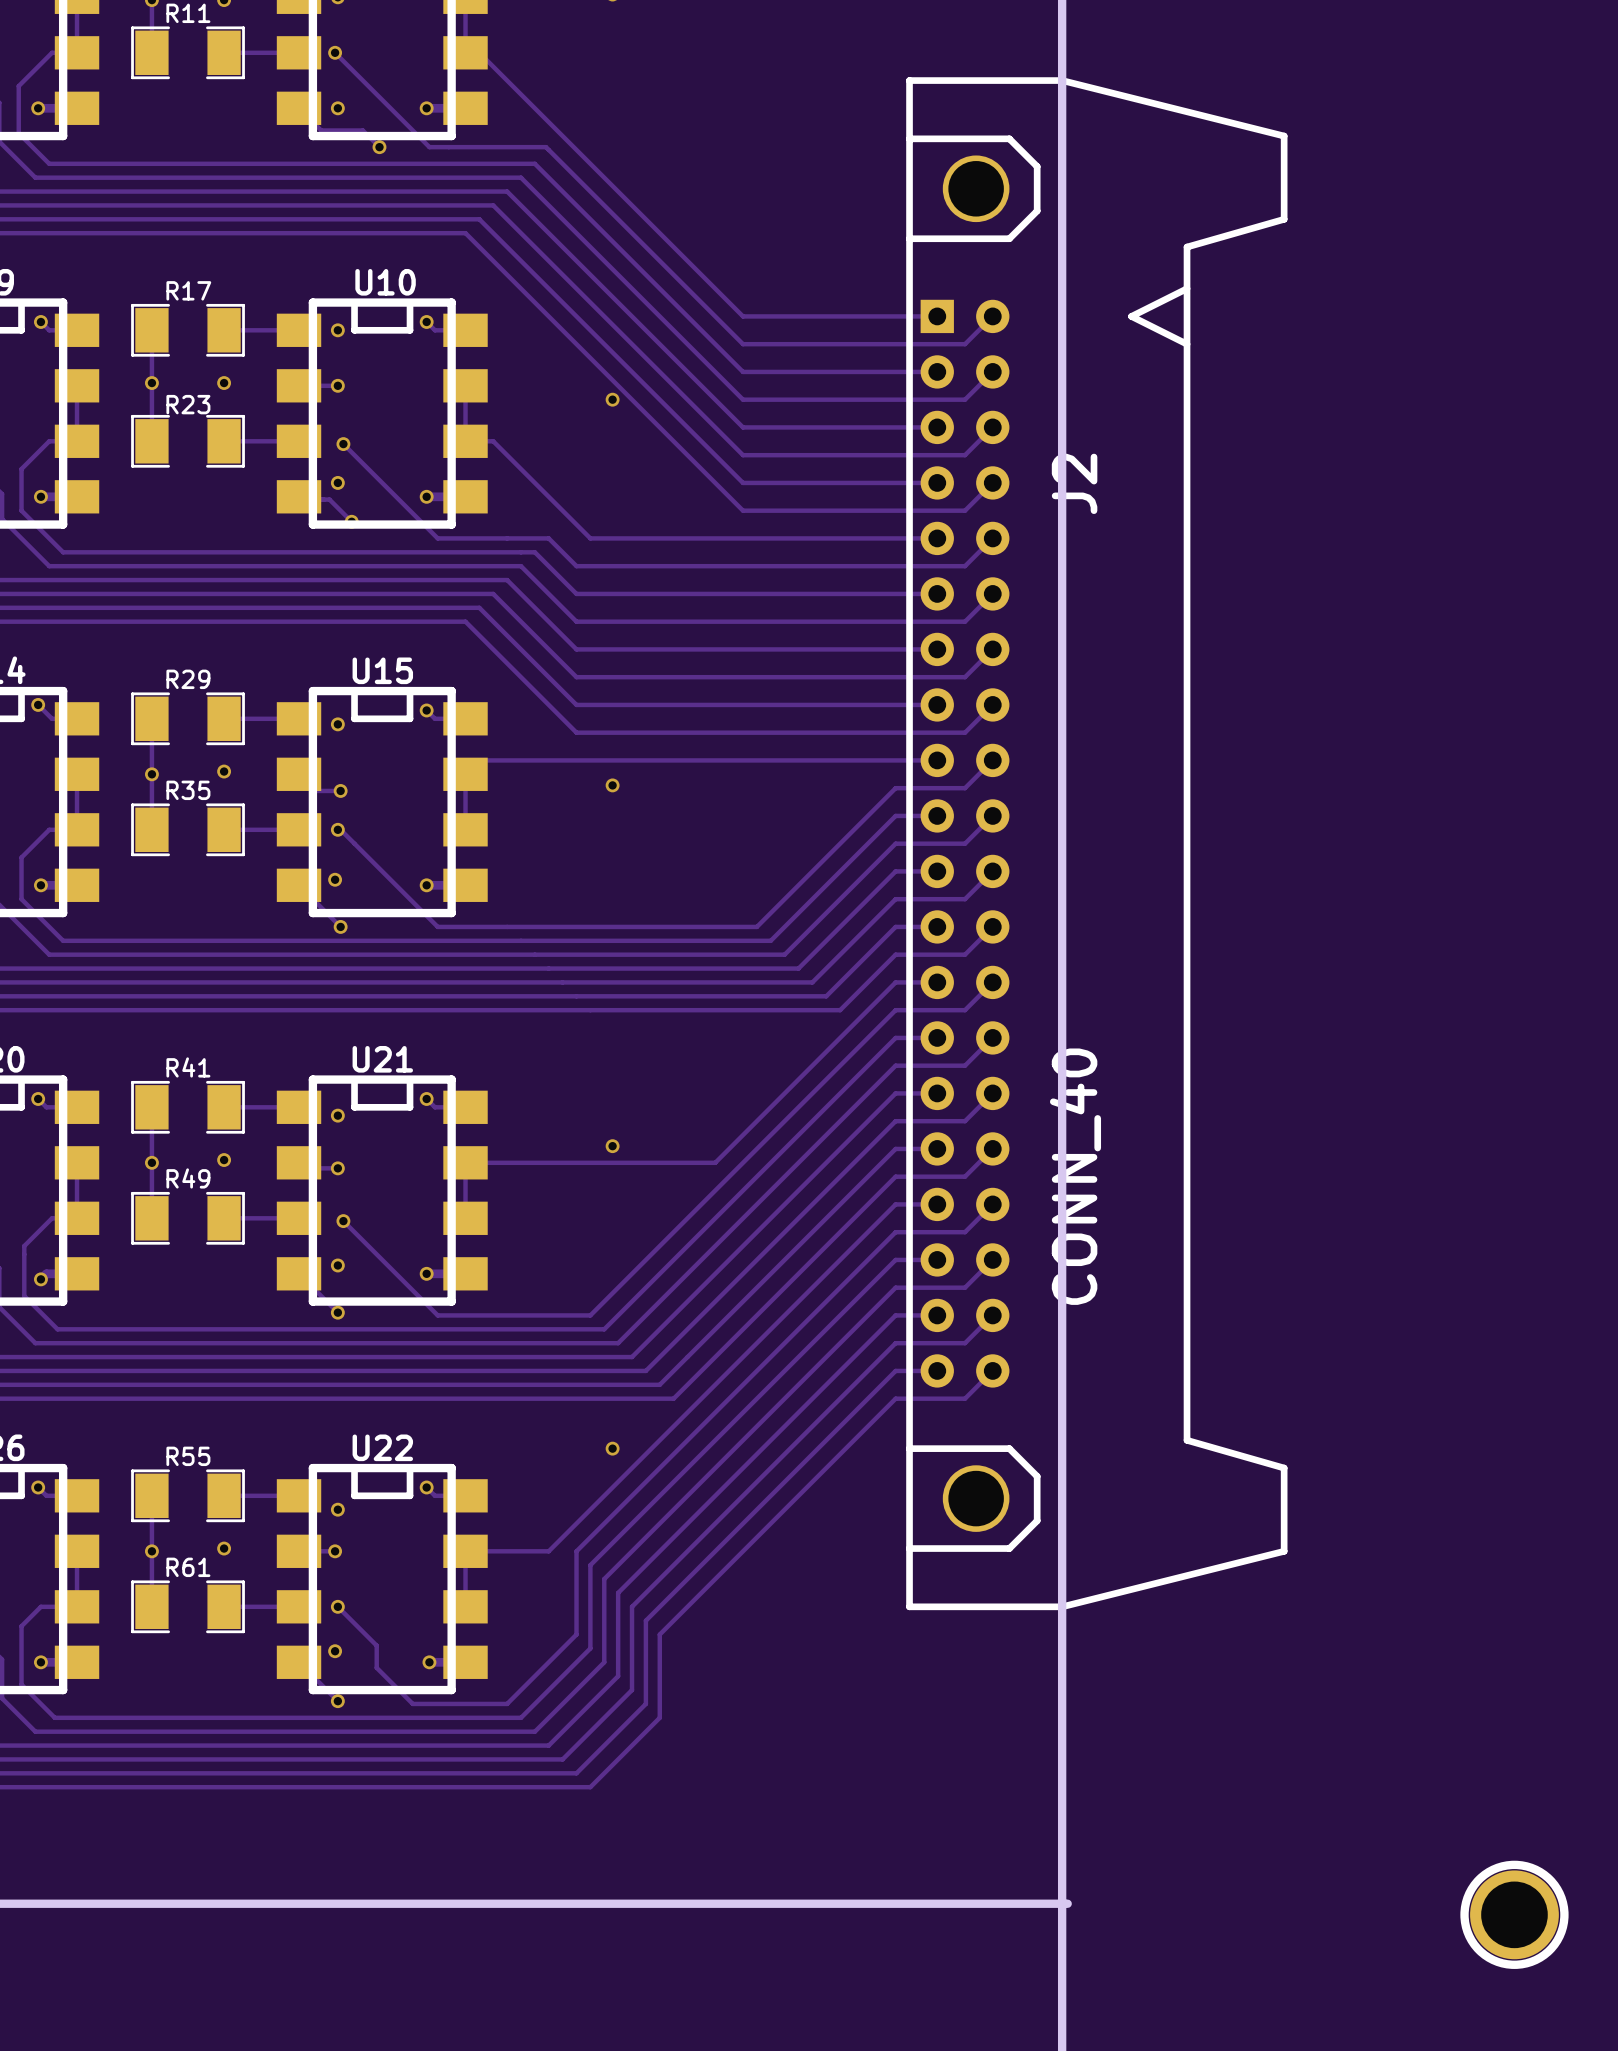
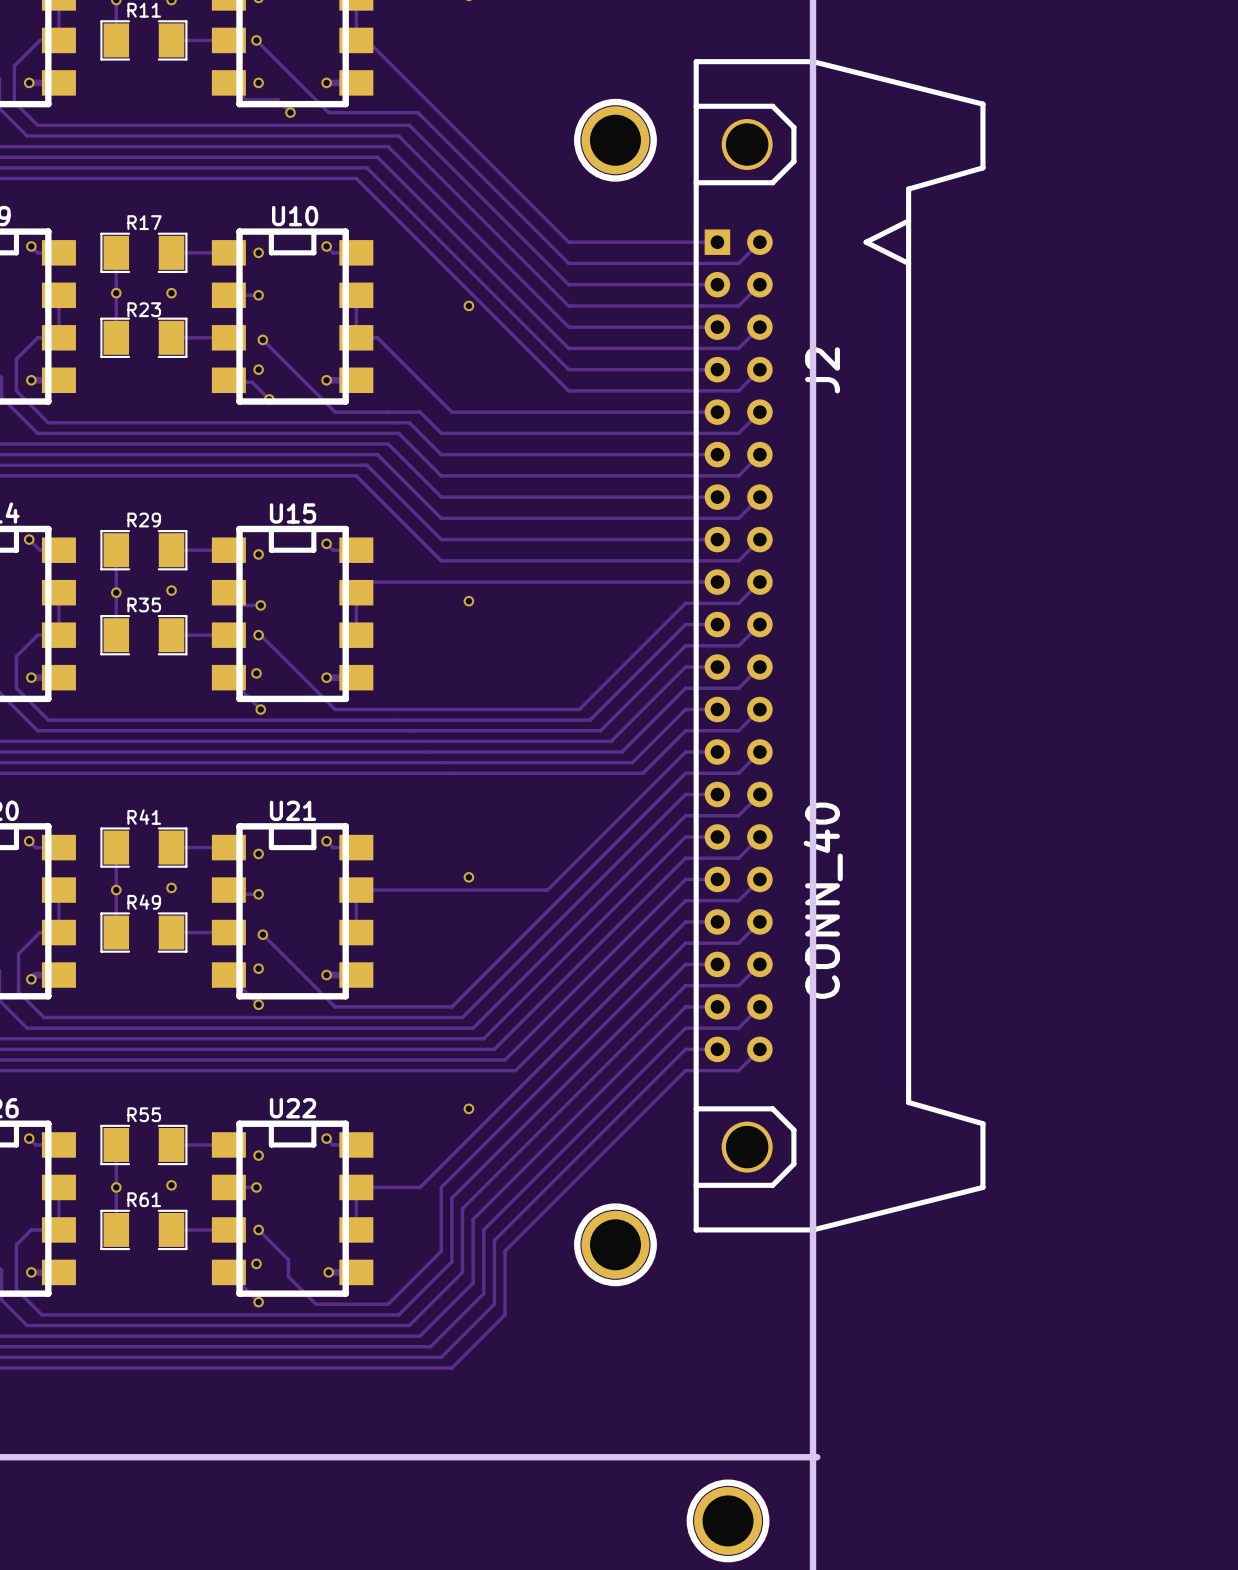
part: none -> (615, 140)
part: none -> (615, 1244)
part: (1514, 1914) -> none
part: none -> (728, 1520)

